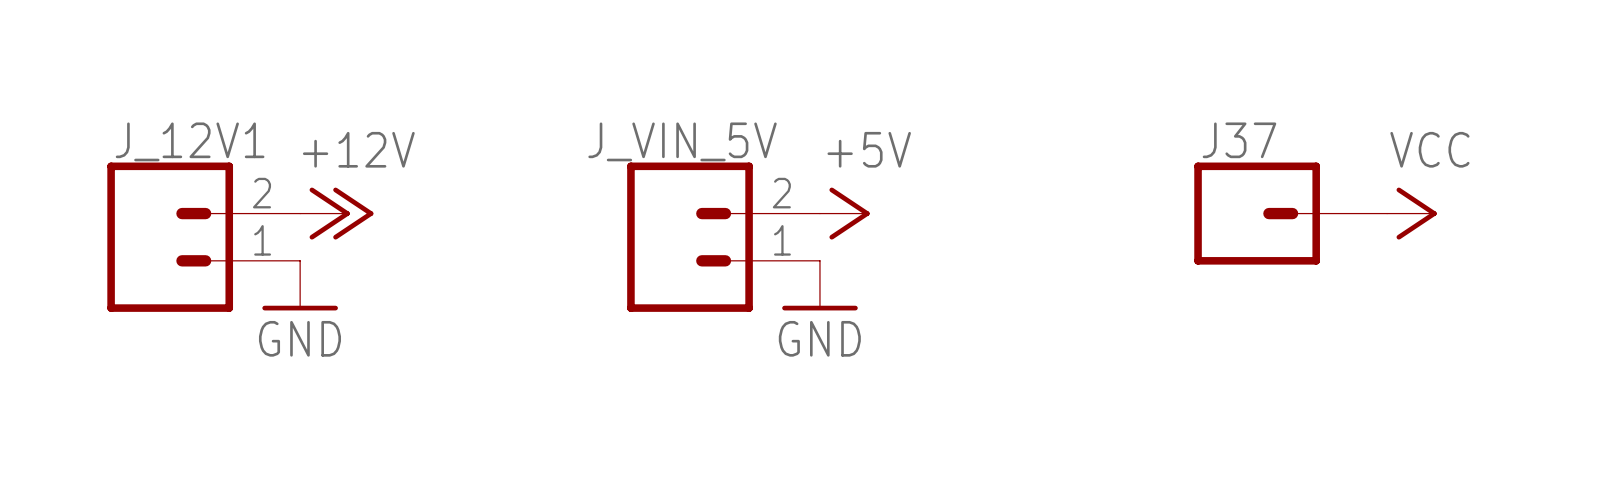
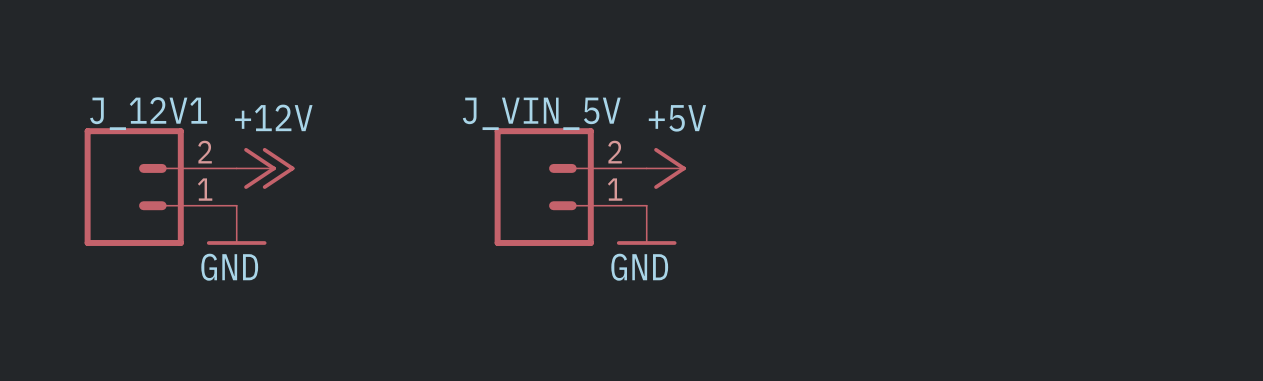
J37: (1290, 213) -> none
power symbol: VCC (1411, 213) -> none

